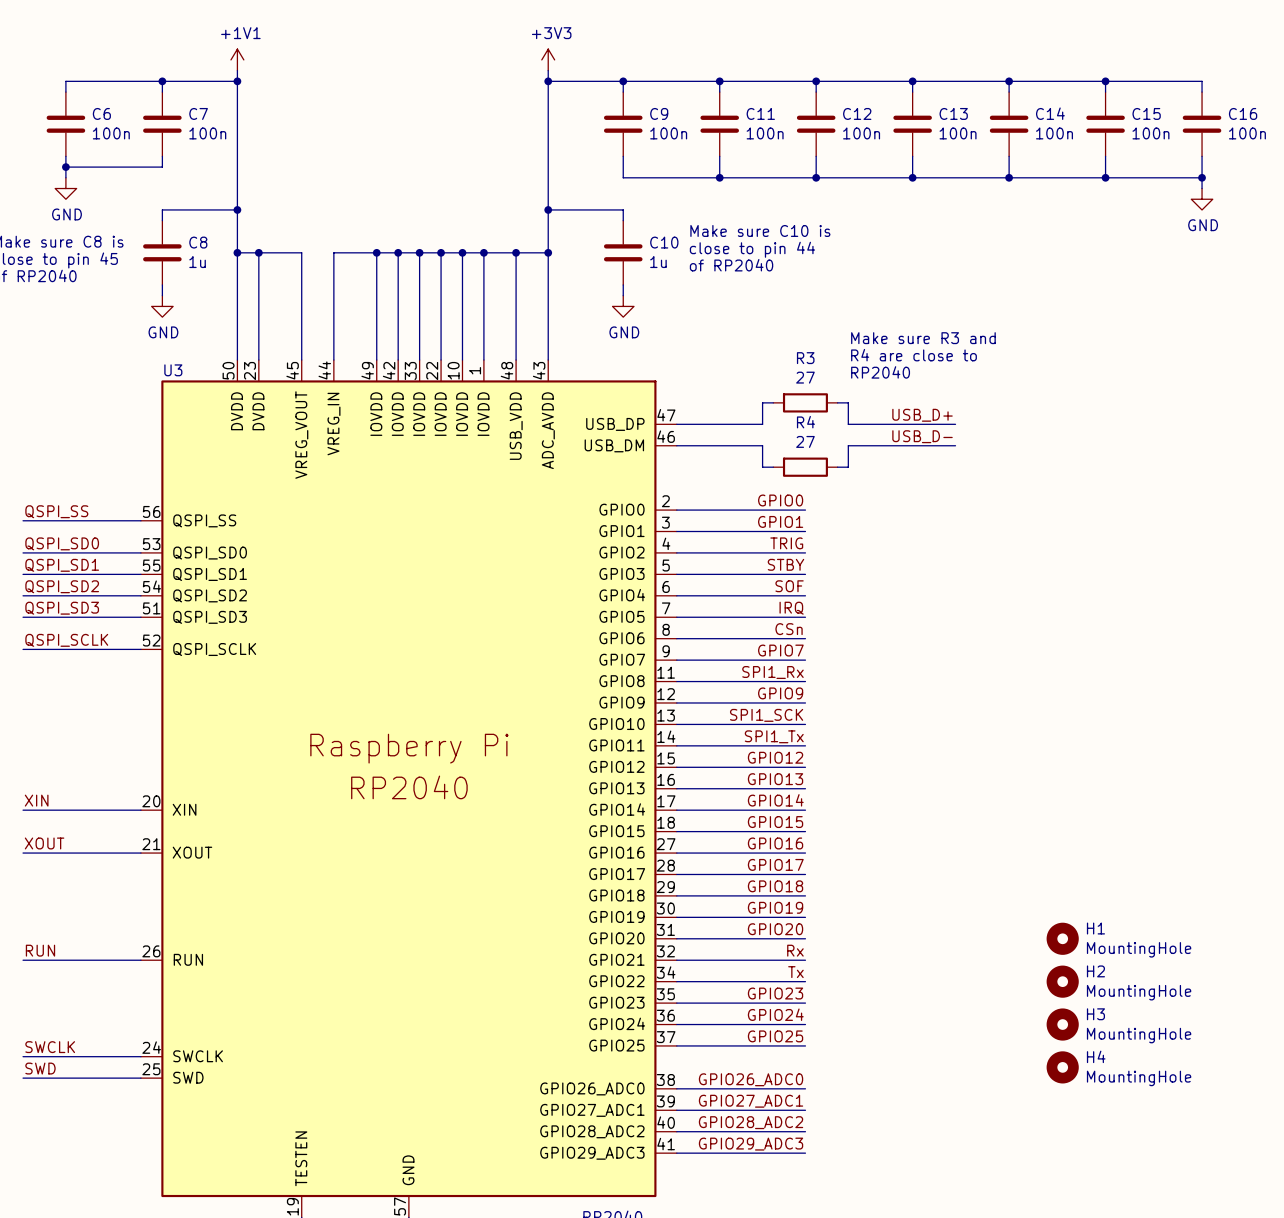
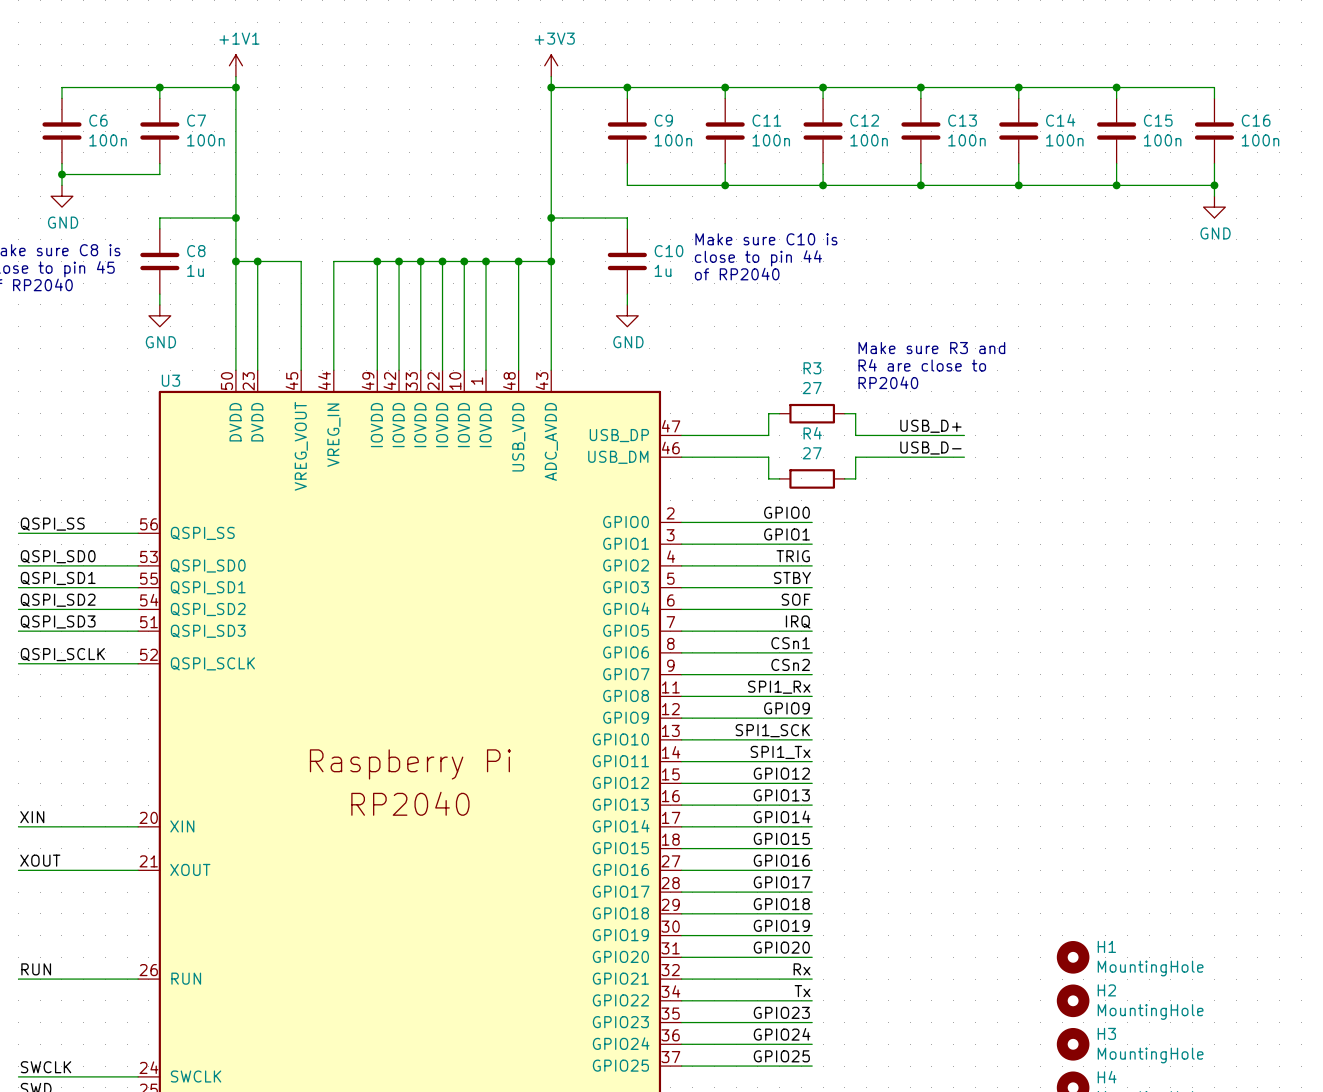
label: CSn (789, 629) -> CSn1 (790, 643)
label: GPIO7 (780, 650) -> CSn2 (790, 664)

